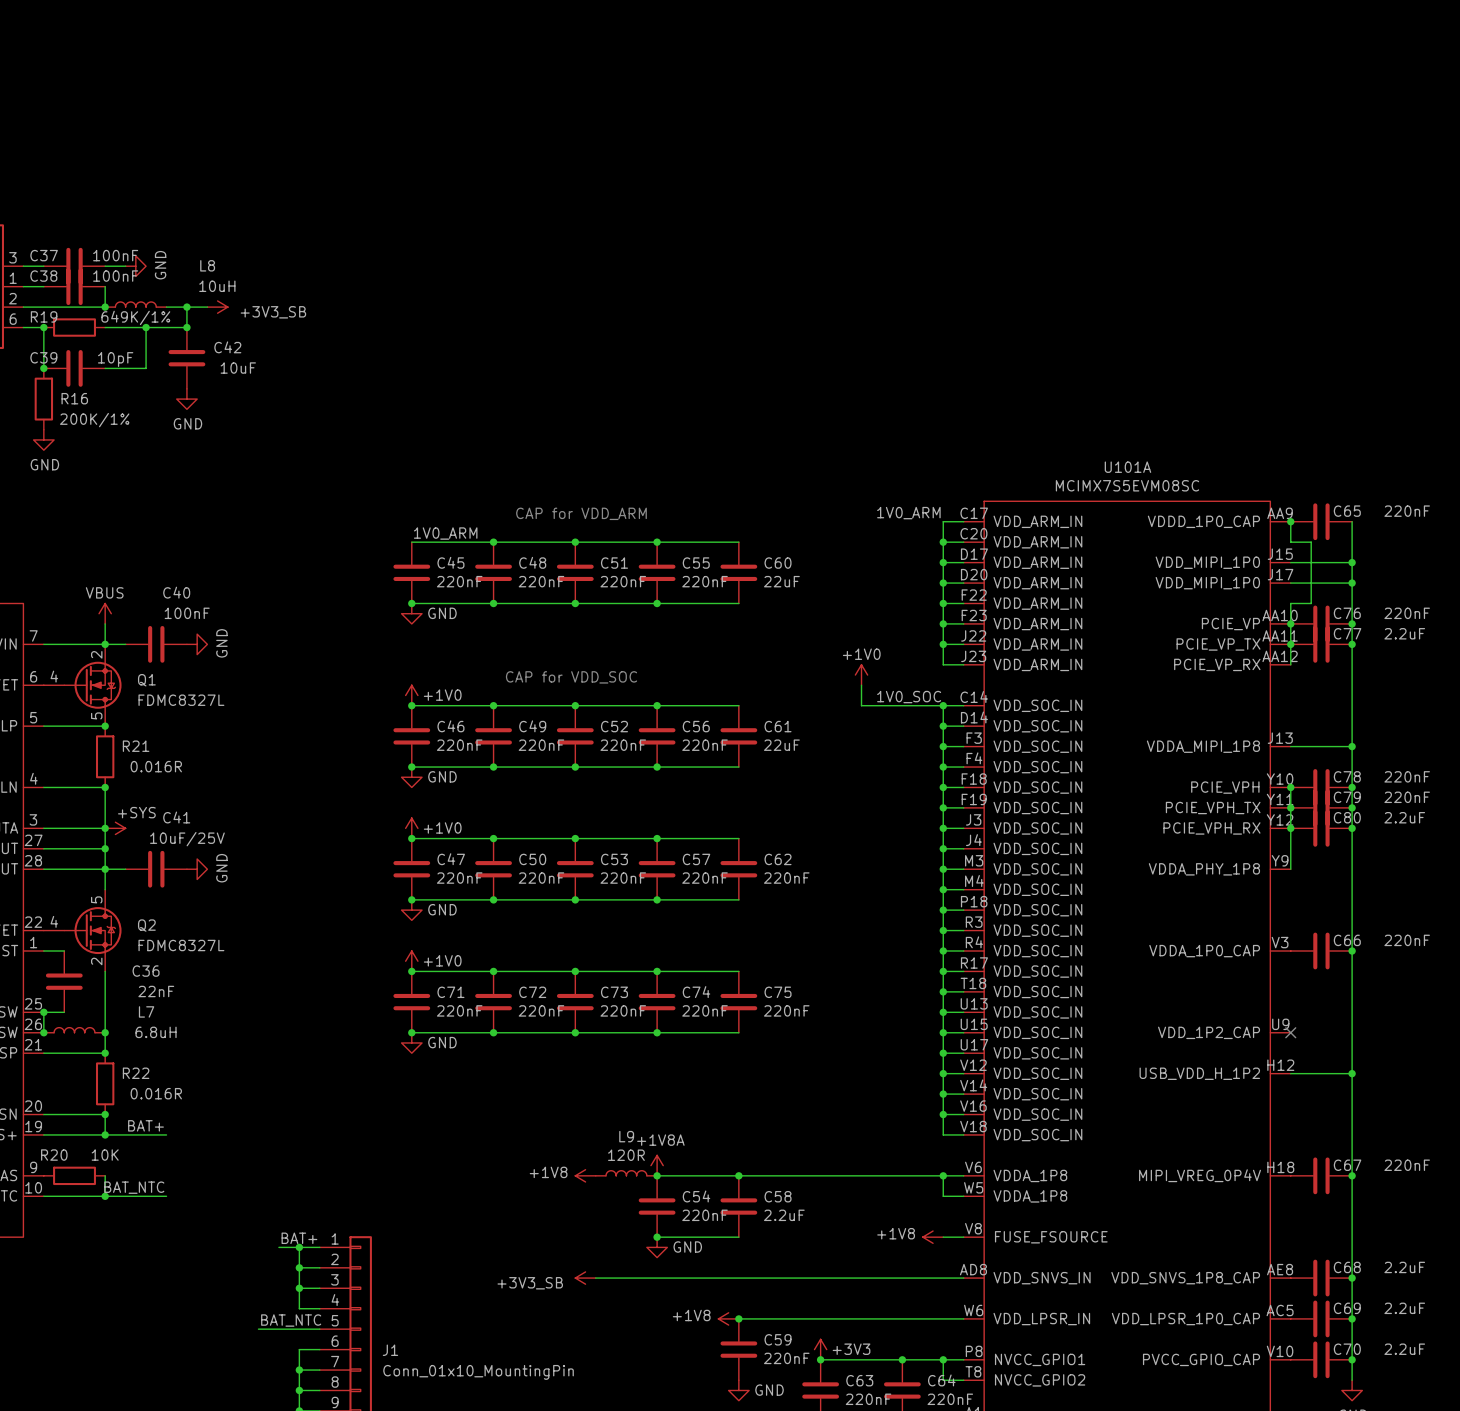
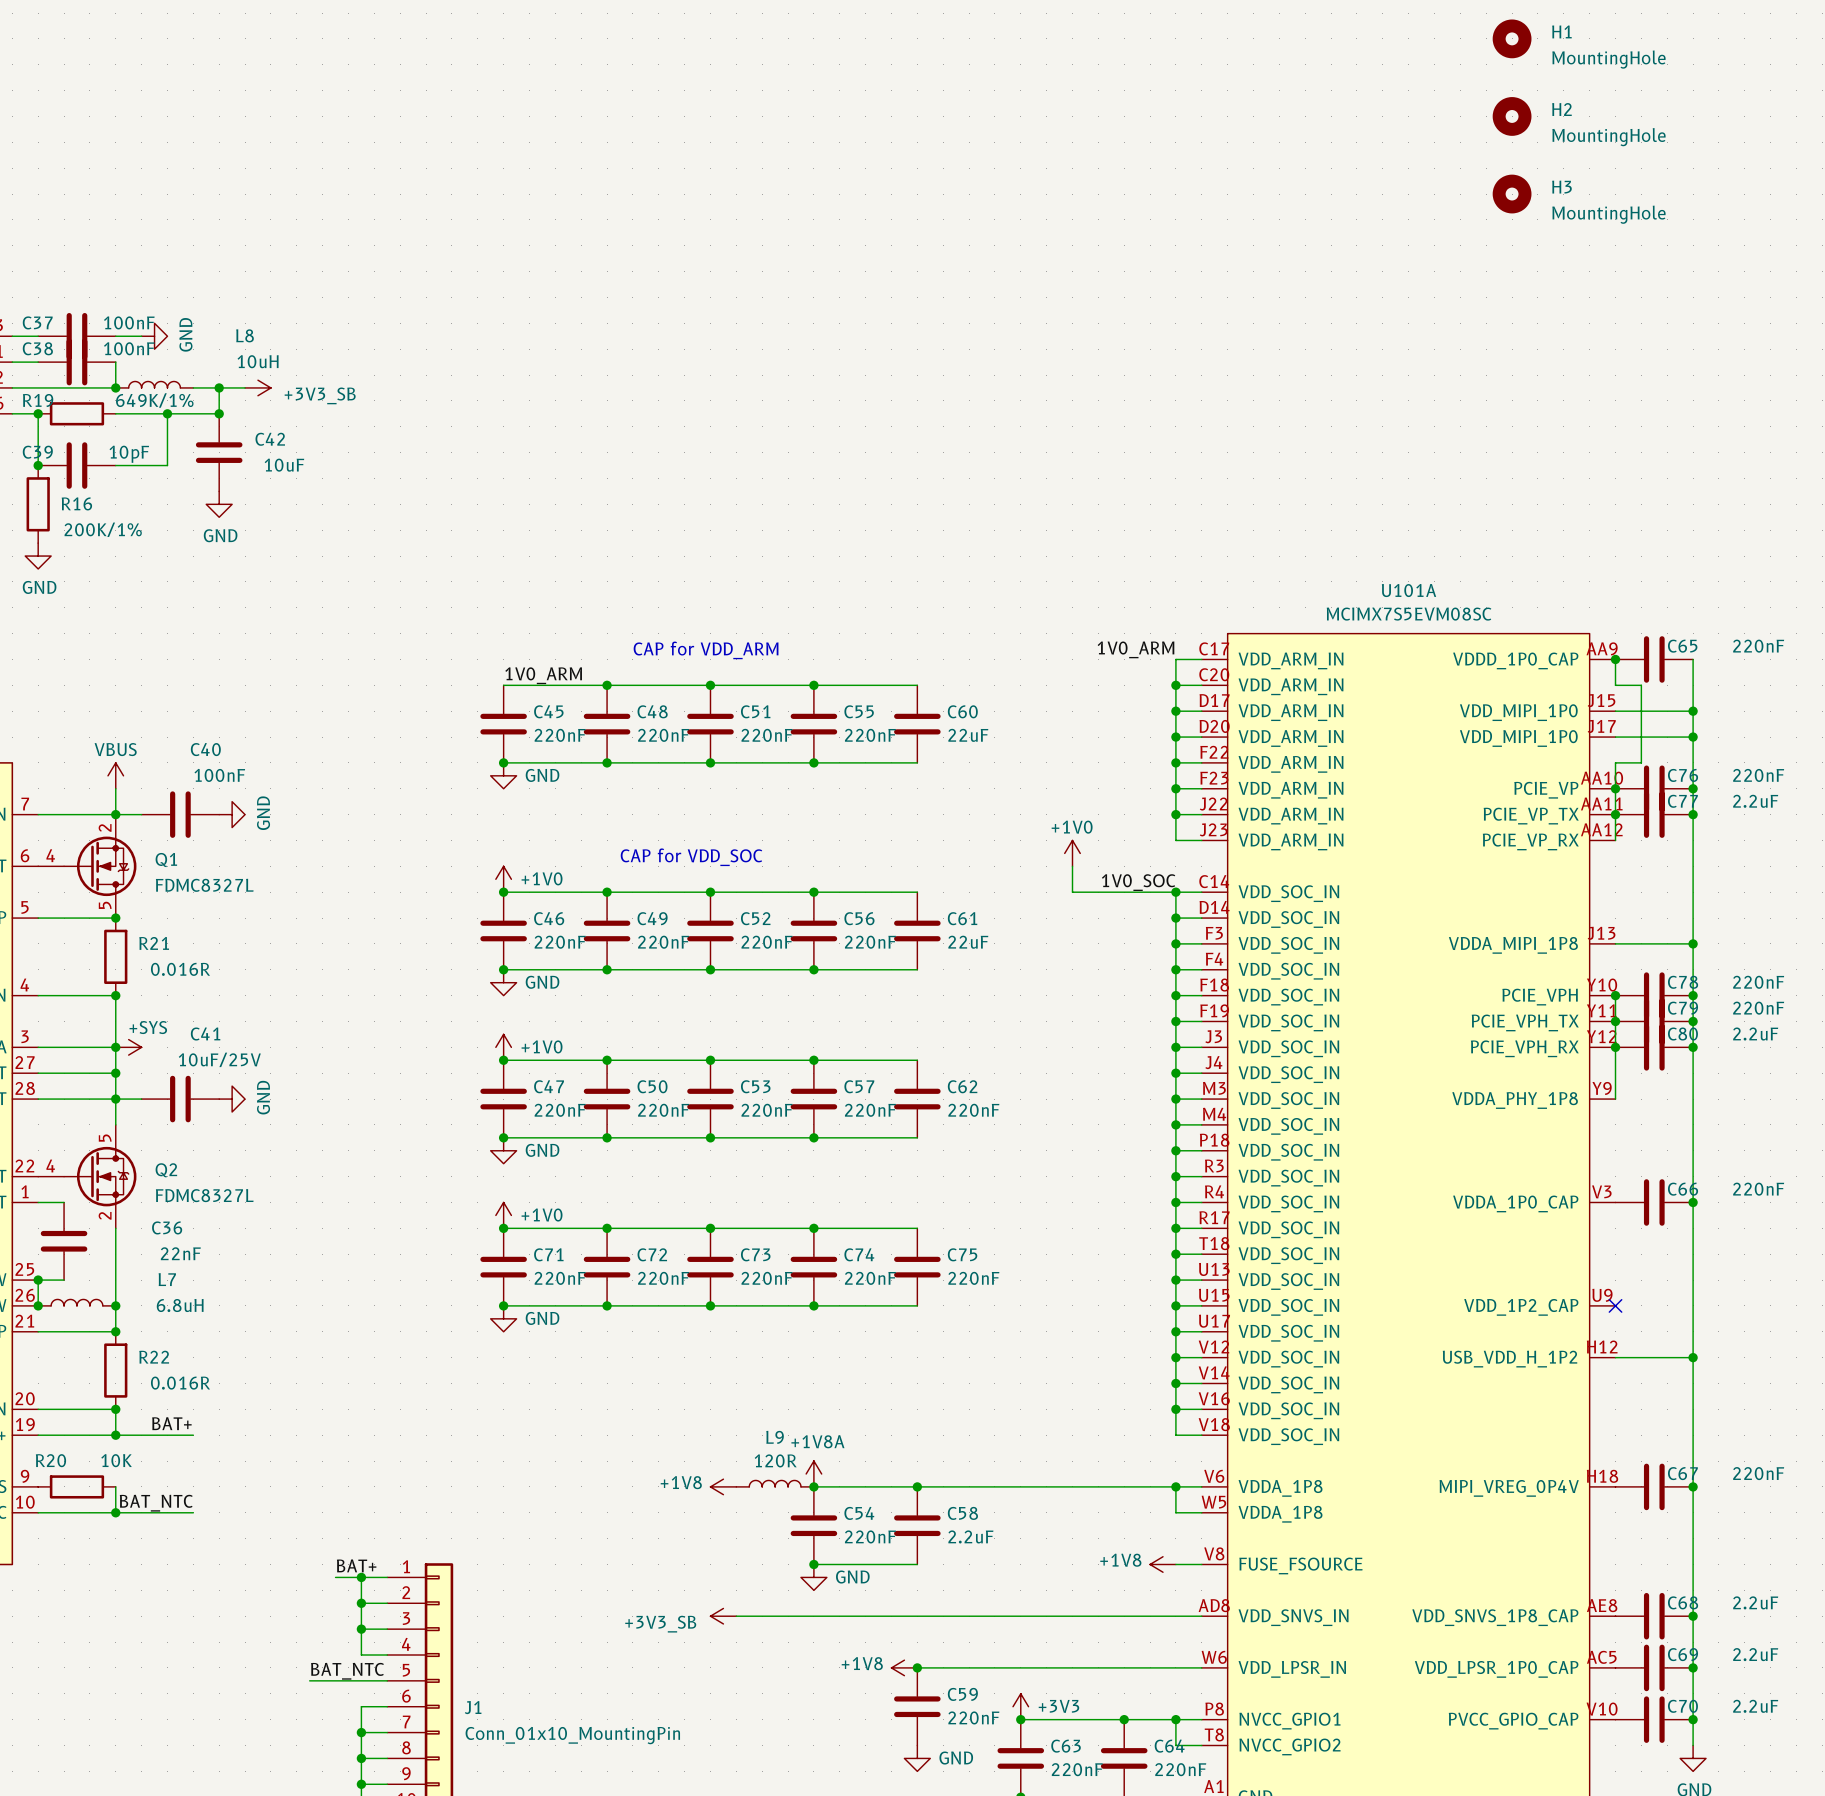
H1: none -> MountingHole (1512, 38)
H2: none -> MountingHole (1512, 116)
H3: none -> MountingHole (1512, 194)

